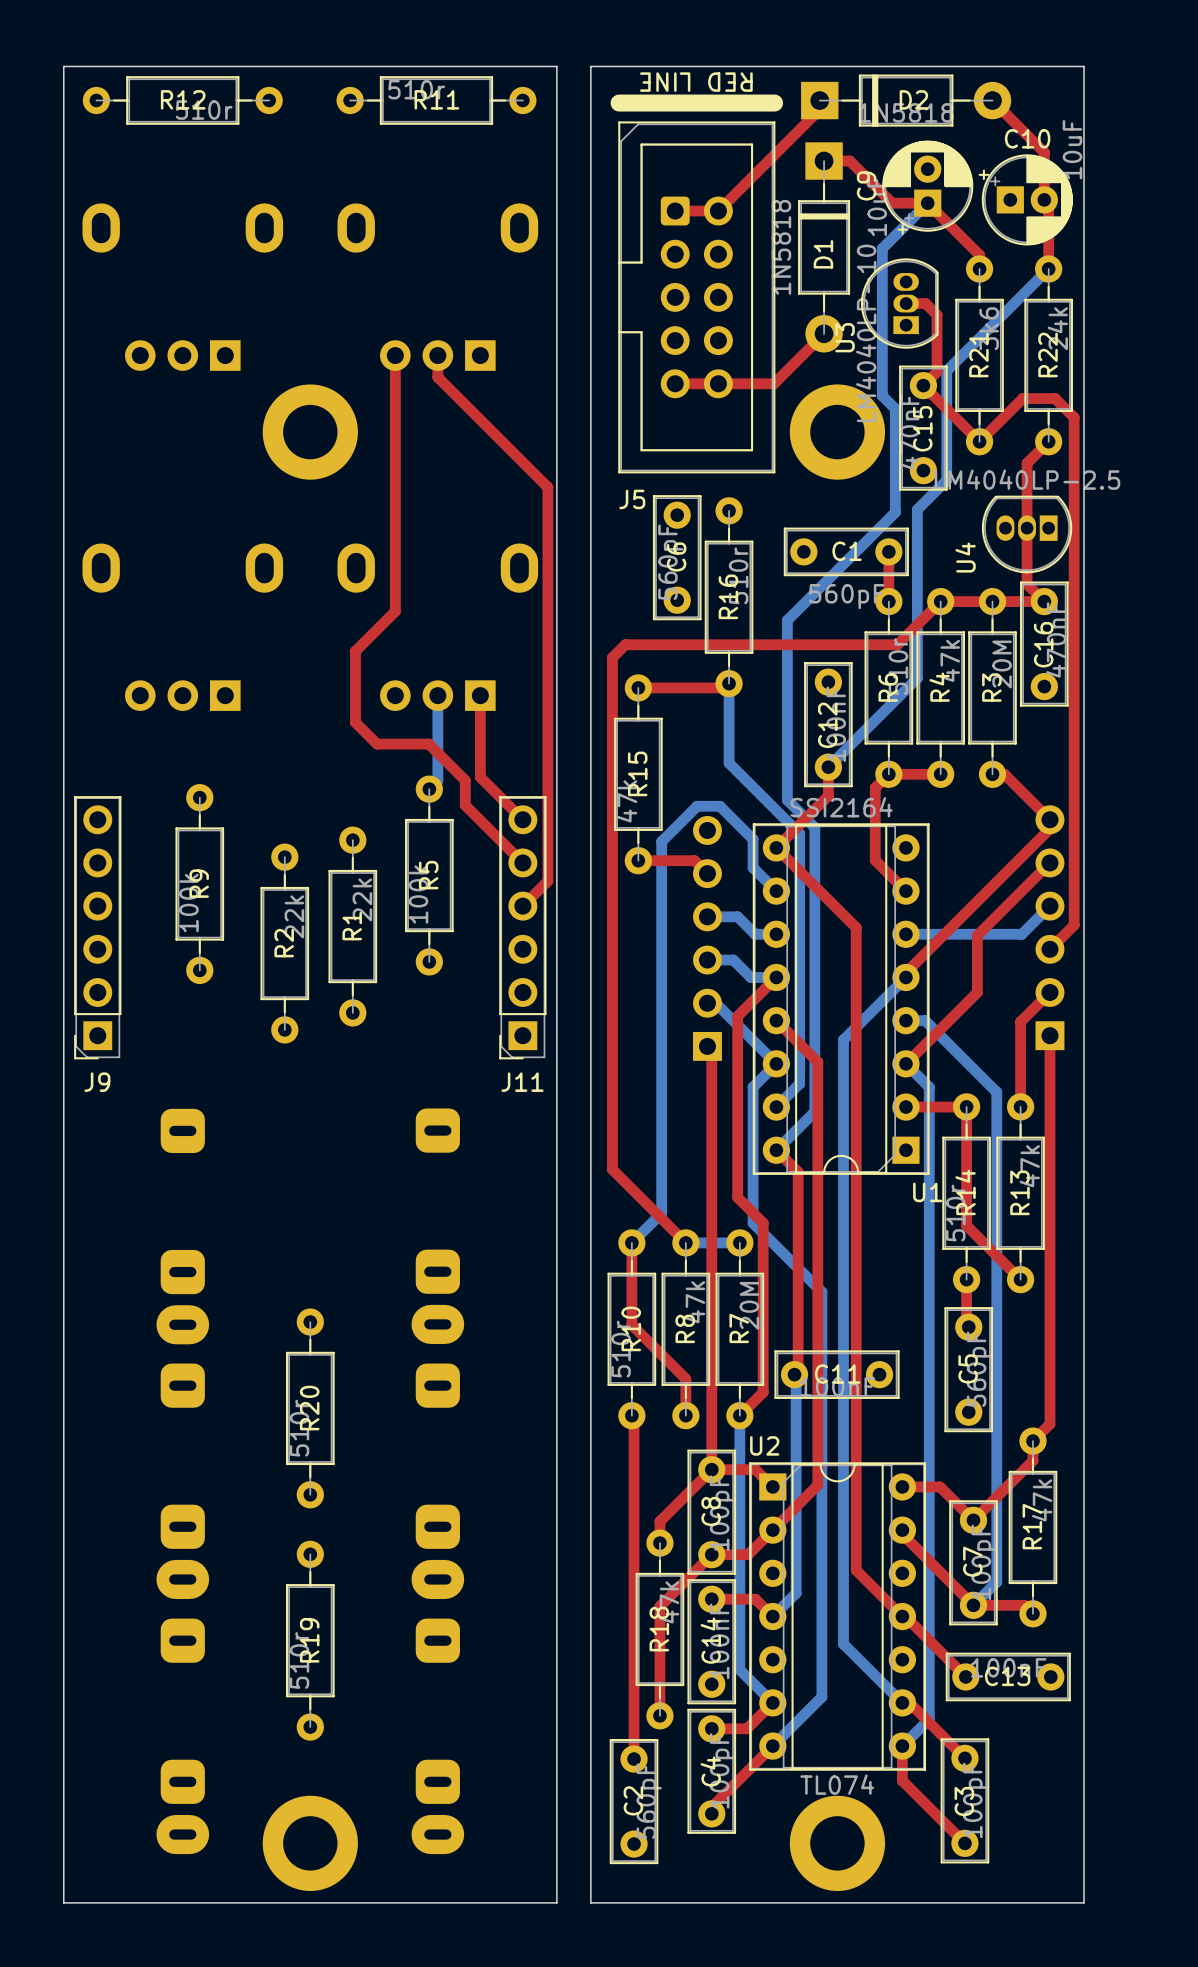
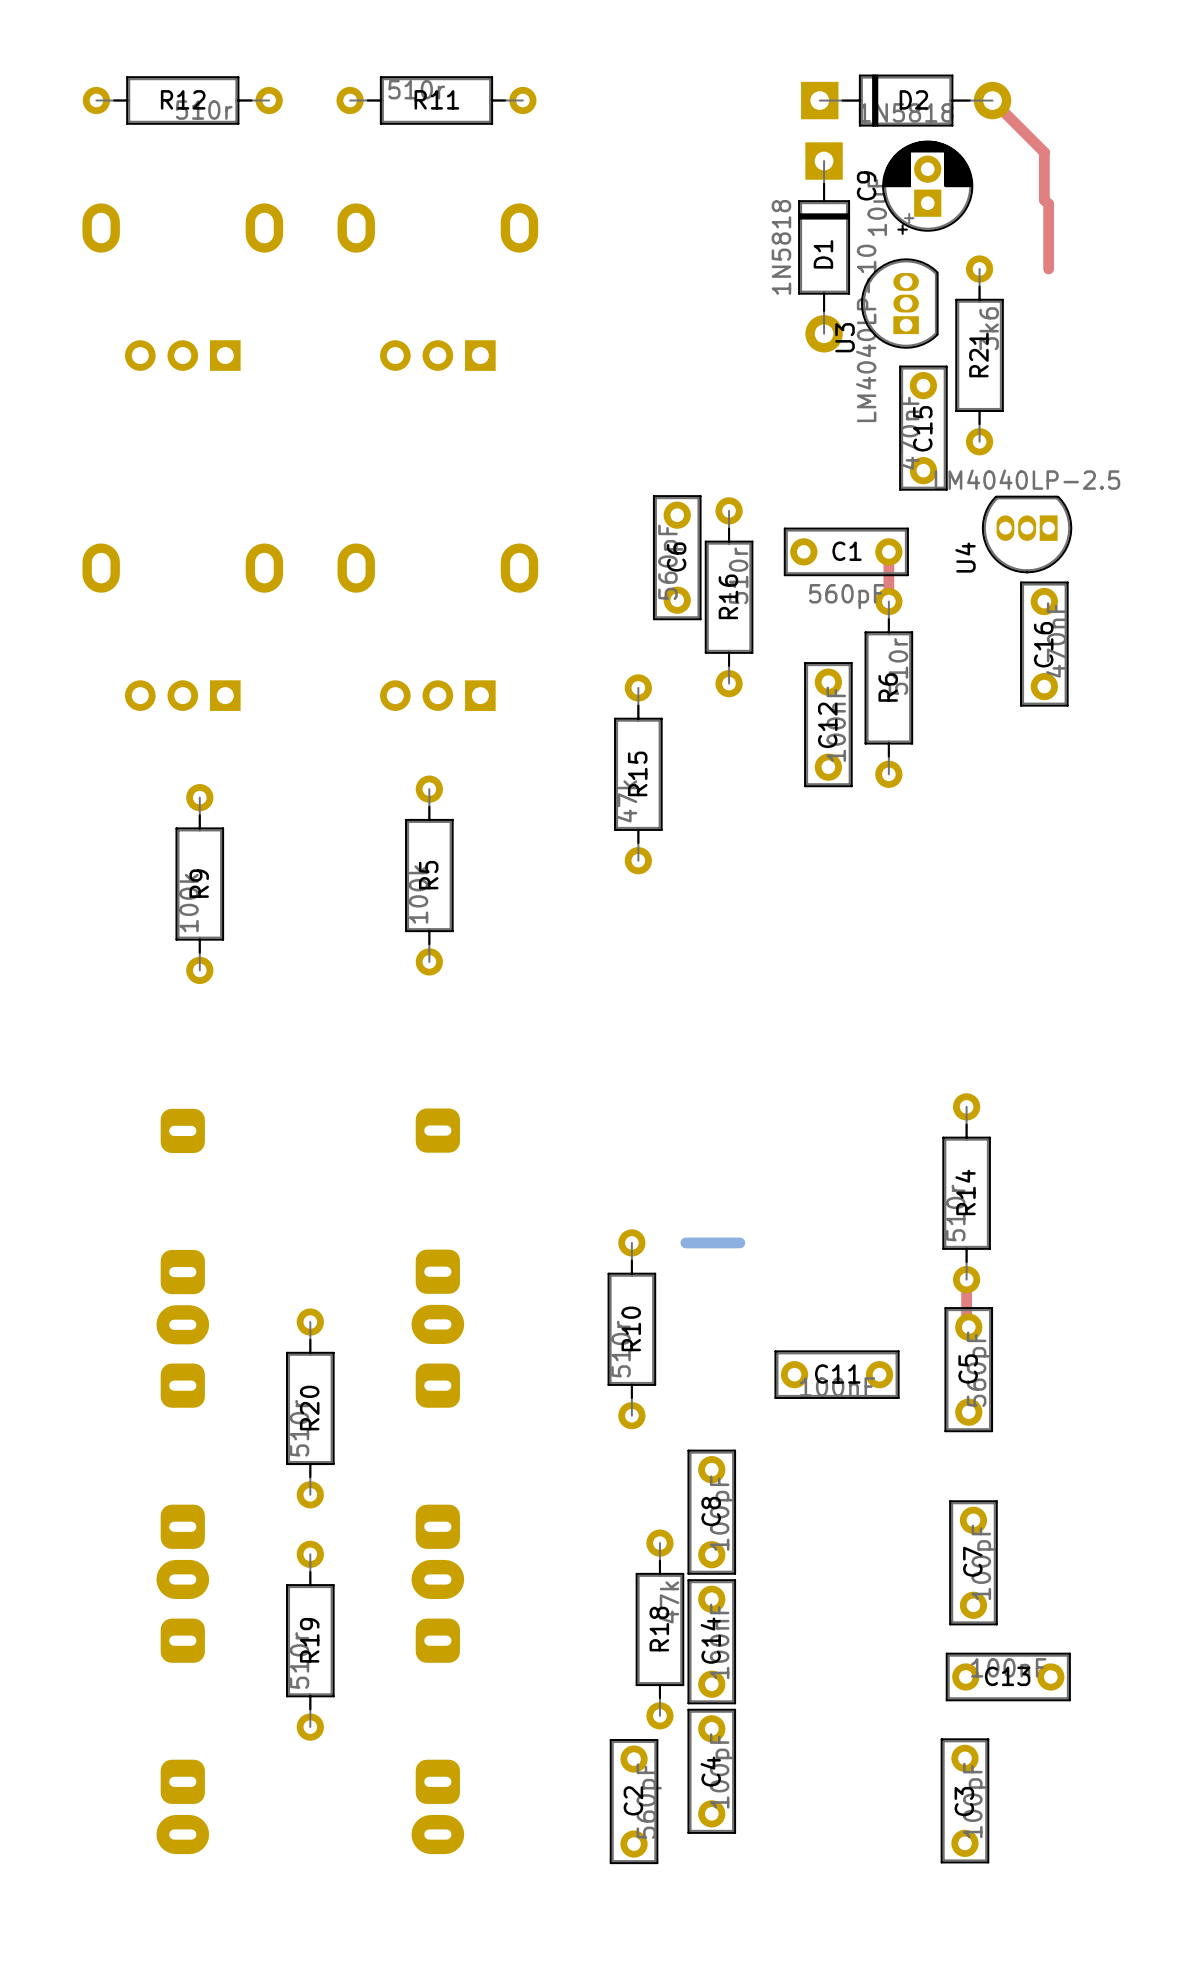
board edge: (63, 66) (556, 66) (556, 1902) (63, 1902) (63, 66) -> none
board edge: (590, 66) (1083, 66) (1083, 1902) (590, 1902) (590, 66) -> none
top track: (819, 100) (819, 109) (718, 211) (675, 211) -> none
top track: (824, 161) (849, 161) (892, 203) (927, 203) (979, 255) (979, 269) -> none
C10: 10uF (1025, 199) -> none
bottom track: (927, 203) (882, 248) (882, 395) (895, 408) (895, 512) (787, 620) (787, 800) (814, 827) (814, 1111) (776, 1150) -> none
bottom track: (1048, 269) (946, 370) (946, 480) (917, 509) (917, 678) (828, 767) -> none
J5: (696, 283) -> none
top track: (906, 303) (925, 303) (937, 314) (937, 372) (923, 385) (979, 441) (1022, 398) (1055, 398) (1074, 417) (1074, 925) (1049, 949) -> none
top track: (824, 333) (774, 383) (675, 383) -> none
top track: (395, 355) (395, 611) (355, 651) (355, 722) (377, 744) (428, 744) (465, 780) (465, 805) (522, 862) -> none
top track: (437, 355) (437, 377) (547, 487) (547, 881) (522, 906) -> none
R22: 24k (1048, 355) -> none
part: (310, 432) -> none
part: (837, 432) -> none
top track: (1048, 441) (1027, 463) (1027, 584) (1044, 601) (940, 601) (897, 644) (625, 644) (612, 657) (612, 1169) (685, 1242) -> none
top track: (729, 683) (724, 687) (638, 687) -> none
bottom track: (729, 683) (729, 763) (799, 833) (799, 1083) (776, 1107) -> none
R4: 47k (940, 687) -> none
R3: 20M (992, 687) -> none
bottom track: (437, 695) (437, 780) (429, 789) -> none
top track: (480, 695) (480, 777) (522, 819) -> none
top track: (828, 767) (828, 795) (776, 847) (856, 927) (856, 1570) (965, 1676) -> none
top track: (940, 774) (888, 774) (875, 787) (875, 860) (905, 891) -> none
top track: (992, 774) (1004, 774) (1049, 819) (1049, 828) (905, 972) (905, 977) -> none
top track: (638, 860) (694, 860) (707, 873) -> none
top track: (1049, 862) (977, 935) (977, 992) (905, 1063) -> none
bottom track: (776, 891) (753, 867) (753, 839) (720, 806) (697, 806) (661, 841) (661, 1213) (631, 1242) -> none
bottom track: (1049, 906) (1021, 934) (905, 934) -> none
bottom track: (707, 916) (737, 916) (755, 934) (776, 934) -> none
R1: 22k (352, 926) -> none
J9: (97, 927) -> none
J11: (522, 927) -> none
part: (1049, 927) -> none
part: (707, 938) -> none
R2: 22k (284, 943) -> none
bottom track: (707, 960) (733, 960) (750, 977) (776, 977) -> none
top track: (776, 977) (737, 1016) (737, 1197) (763, 1223) (763, 1392) (739, 1415) -> none
bottom track: (905, 977) (843, 1039) (843, 1644) (902, 1702) -> none
top track: (1049, 992) (1020, 1021) (1020, 1106) -> none
U1: SSI2164 (841, 999) -> none
bottom track: (707, 1003) (715, 1003) (776, 1063) (753, 1087) (753, 1223) (821, 1292) (821, 1696) (772, 1746) -> none
top track: (776, 1020) (817, 1062) (817, 1485) (748, 1554) (711, 1554) (659, 1606) (659, 1715) -> none
bottom track: (905, 1020) (925, 1020) (996, 1092) (996, 1582) (973, 1605) -> none
top track: (1049, 1035) (1049, 1424) (1032, 1441) (1032, 1460) (973, 1520) (940, 1486) (902, 1486) -> none
top track: (707, 1046) (711, 1050) (711, 1469) -> none
bottom track: (905, 1063) (929, 1087) (929, 1719) (902, 1746) -> none
top track: (966, 1106) (966, 1225) (1020, 1279) -> none
top track: (905, 1107) (966, 1107) -> none
top track: (776, 1150) (798, 1172) (798, 1371) (794, 1374) -> none
R13: 47k (1020, 1193) -> none
top track: (631, 1242) (631, 1324) (685, 1378) (685, 1415) -> none
R8: 47k (685, 1329) -> none
R7: 20M (739, 1329) -> none
bottom track: (794, 1374) (796, 1376) (796, 1593) (772, 1616) -> none
top track: (631, 1415) (634, 1417) (634, 1759) -> none
bottom track: (739, 1415) (739, 1669) (772, 1702) -> none
top track: (711, 1469) (659, 1521) (659, 1543) -> none
top track: (711, 1469) (755, 1469) (772, 1486) -> none
R17: 47k (1032, 1527) -> none
top track: (902, 1530) (902, 1534) (973, 1605) (1024, 1605) (1032, 1613) -> none
top track: (711, 1599) (755, 1599) (772, 1616) -> none
U2: TL074 (837, 1616) -> none
top track: (772, 1702) (746, 1728) (711, 1728) -> none
top track: (902, 1702) (909, 1702) (964, 1758) -> none
top track: (772, 1746) (711, 1807) (711, 1813) -> none
top track: (902, 1746) (902, 1780) (964, 1843) -> none
part: (310, 1843) -> none
part: (837, 1843) -> none

